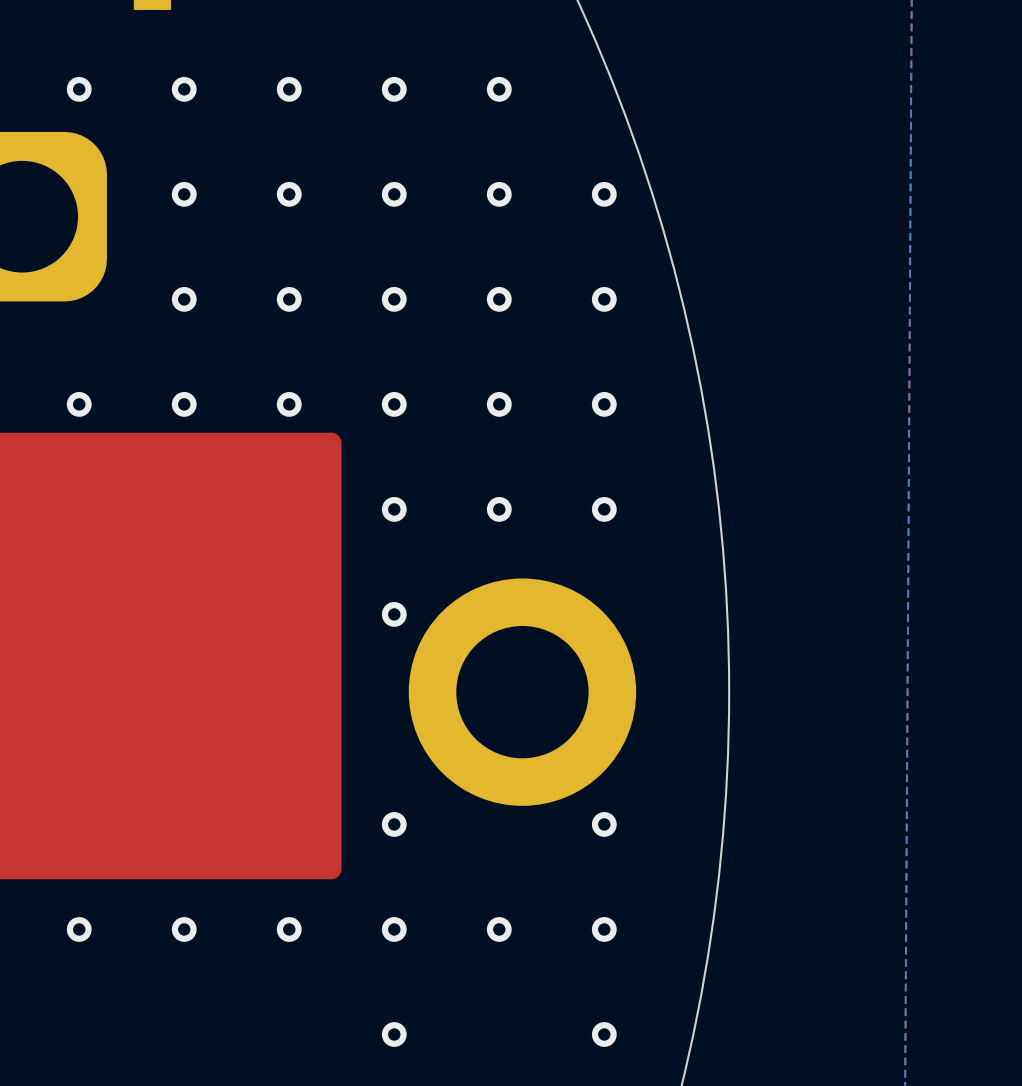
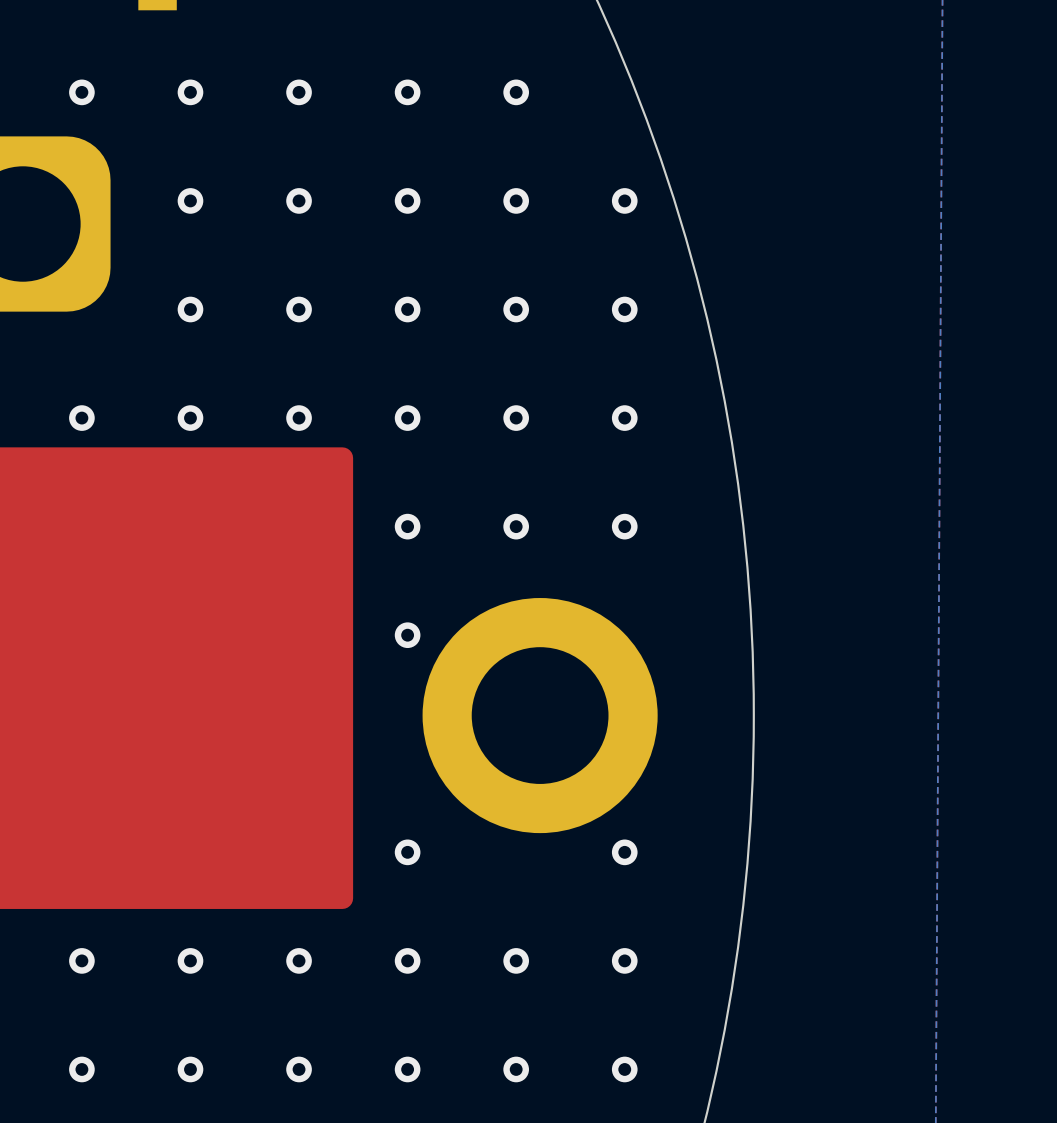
via: none -> (81, 1069)
via: none -> (190, 1069)
via: none -> (299, 1069)
via: none -> (516, 1069)

